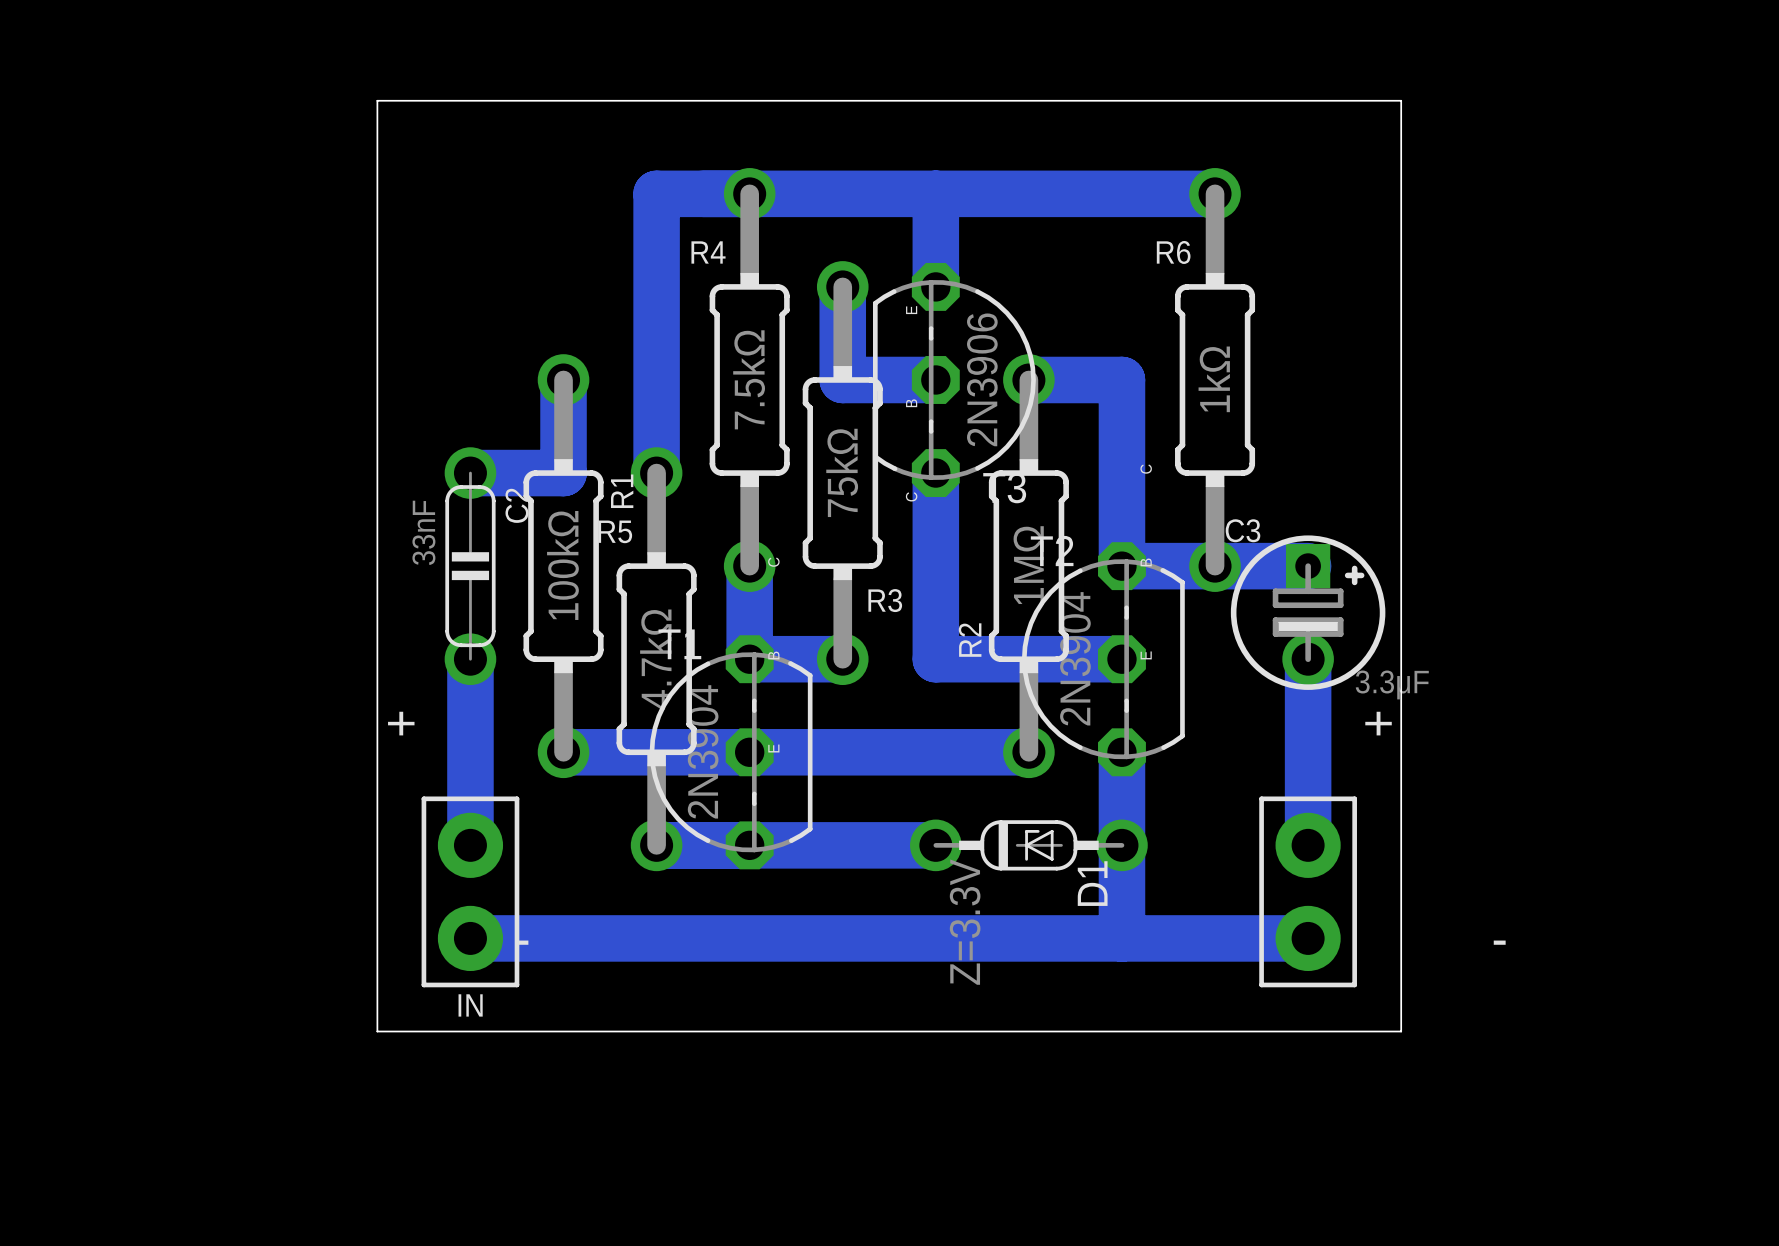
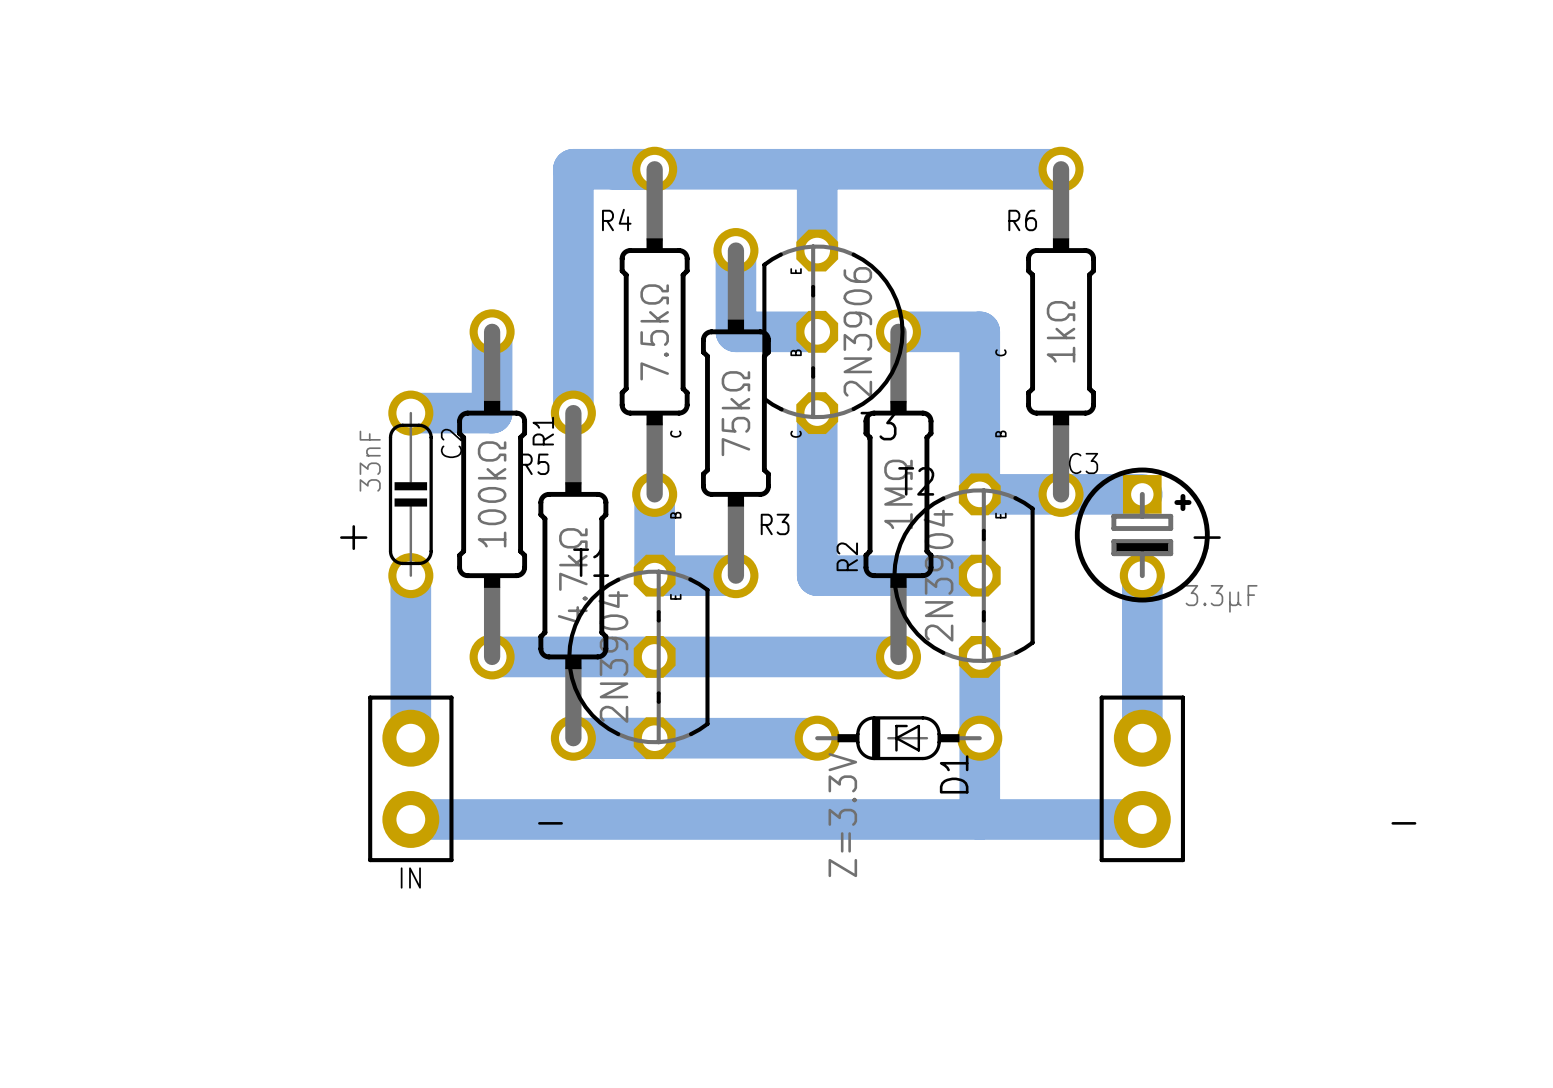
board edge: (377, 100) (1401, 100) (1401, 1031) (377, 1031) (377, 100) -> none

